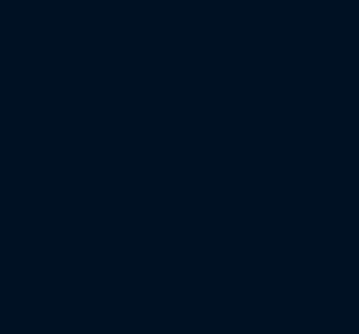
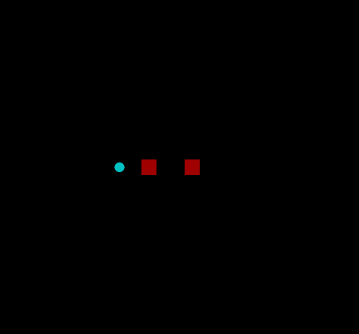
part: none -> (157, 167)

